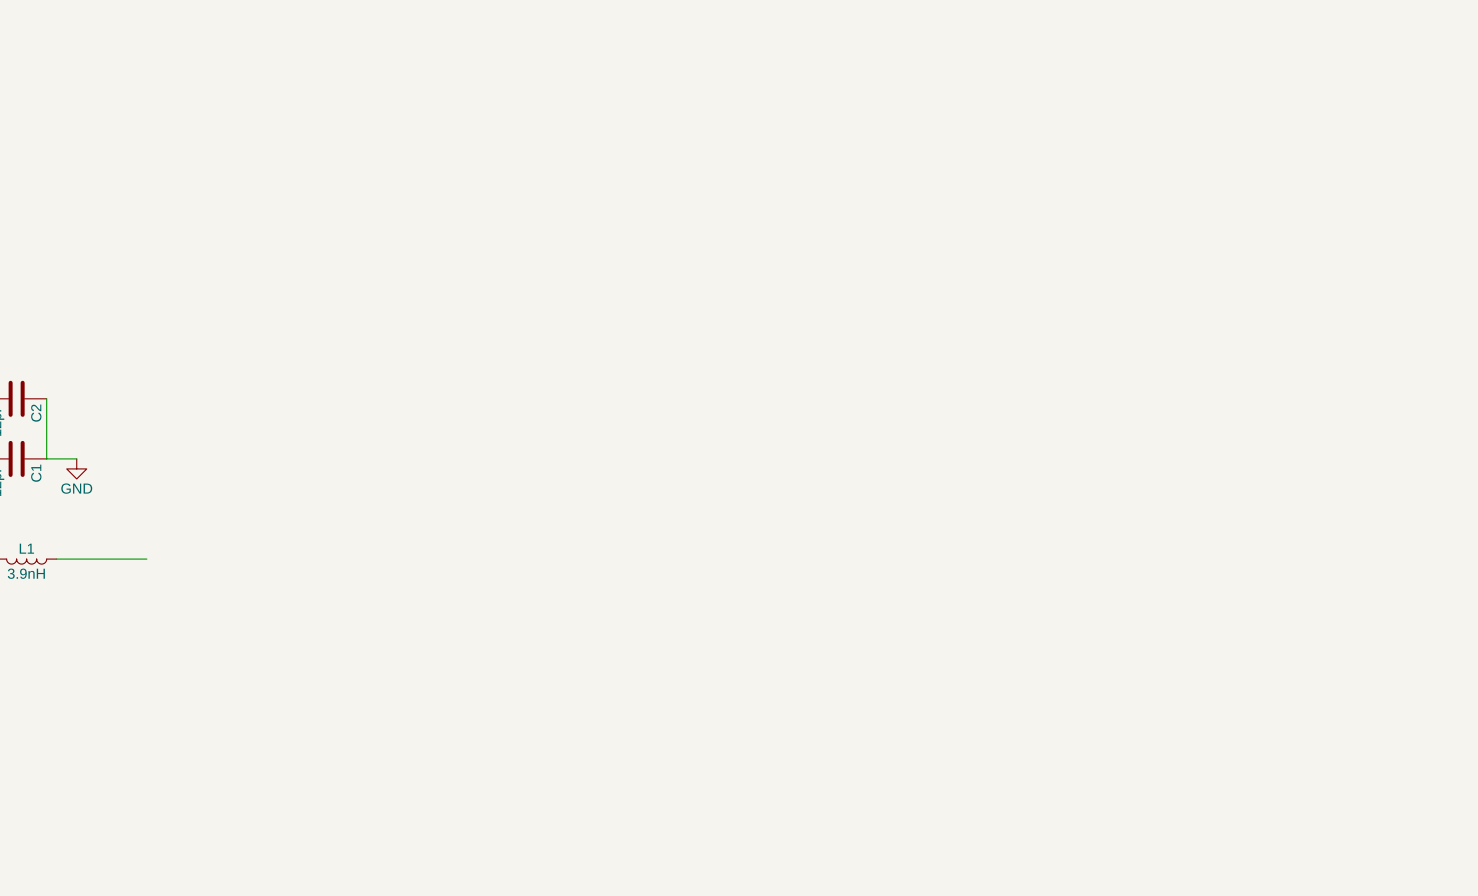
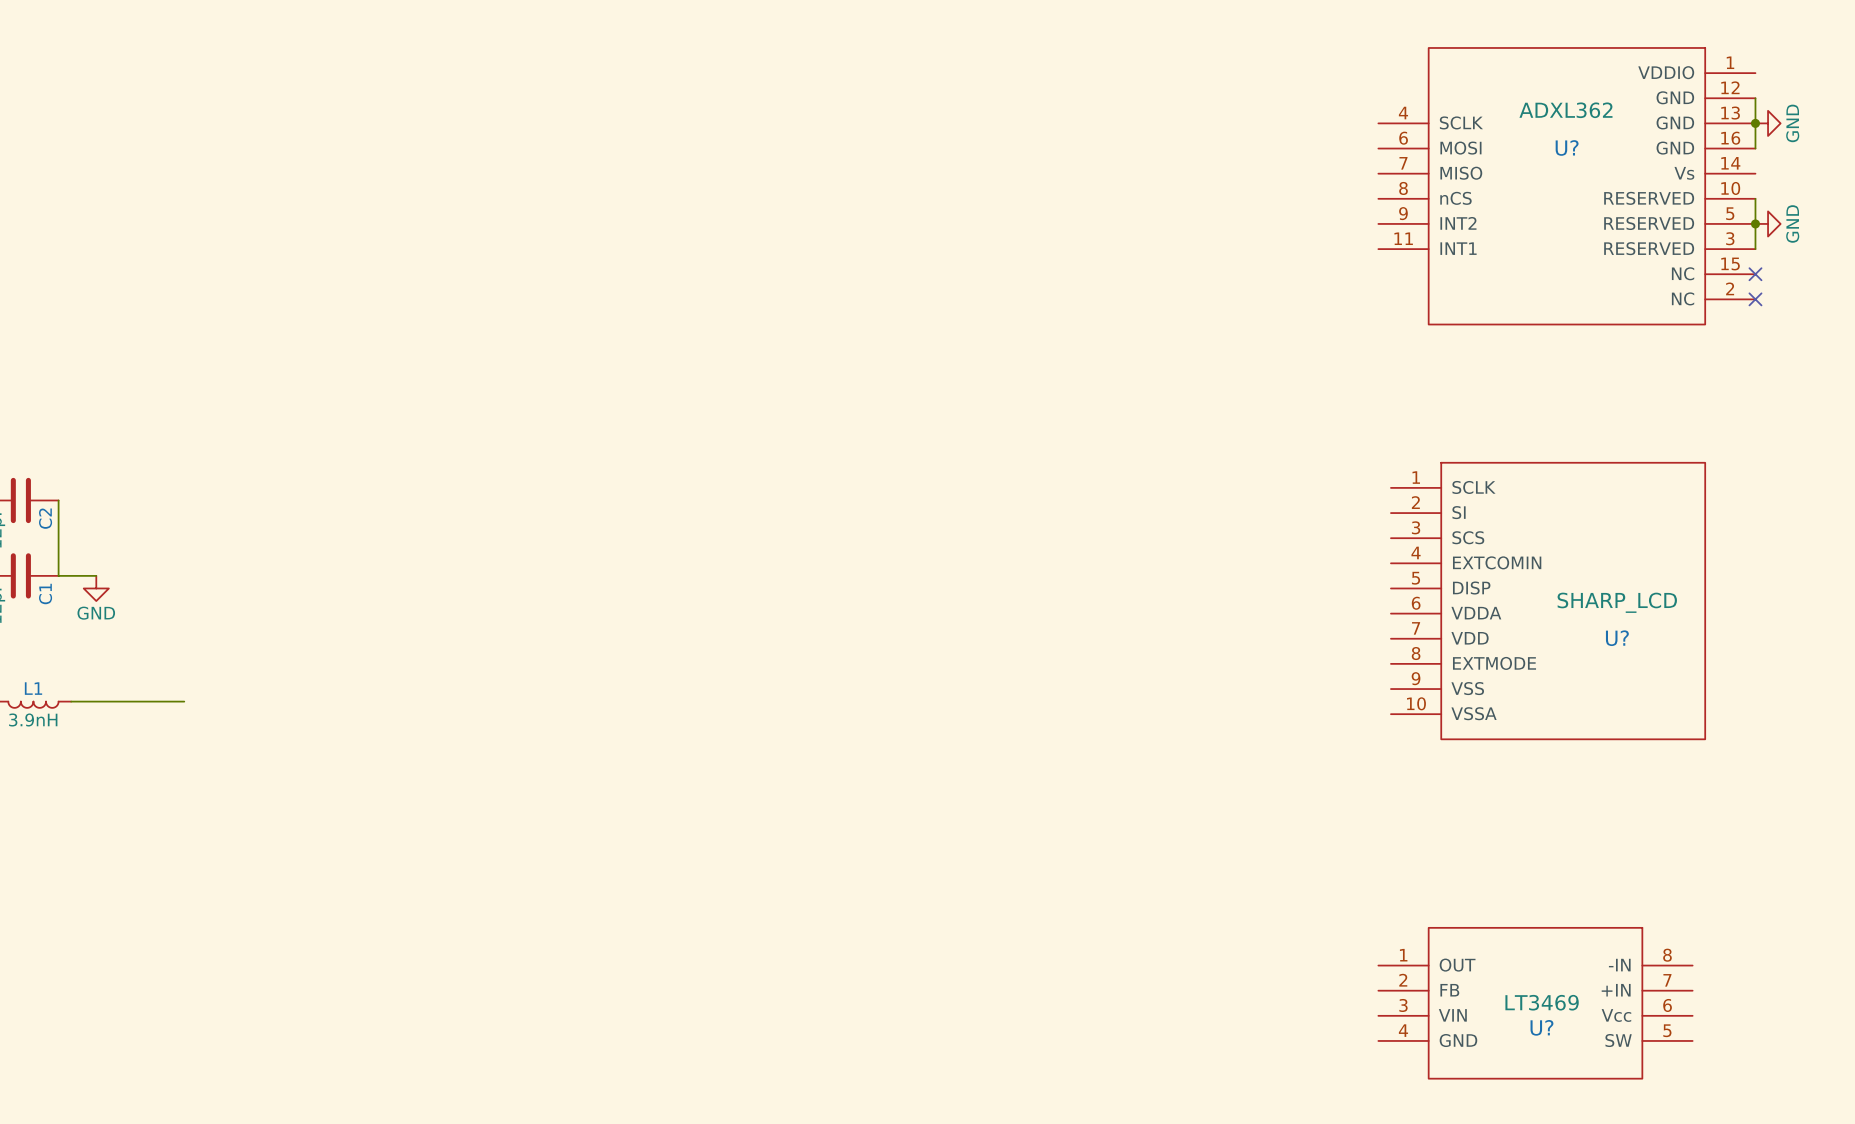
wire: none -> (1755, 98) (1755, 148)
junction: none -> (1755, 123)
power symbol: none -> GND (1768, 123)
U?: none -> ADXL362 (1566, 186)
wire: none -> (1755, 198) (1755, 249)
junction: none -> (1755, 223)
power symbol: none -> GND (1768, 223)
no-connect mark: none -> (1755, 274)
no-connect mark: none -> (1755, 299)
U?: none -> SHARP_LCD (1548, 601)
U?: none -> LT3469 (1535, 1003)

